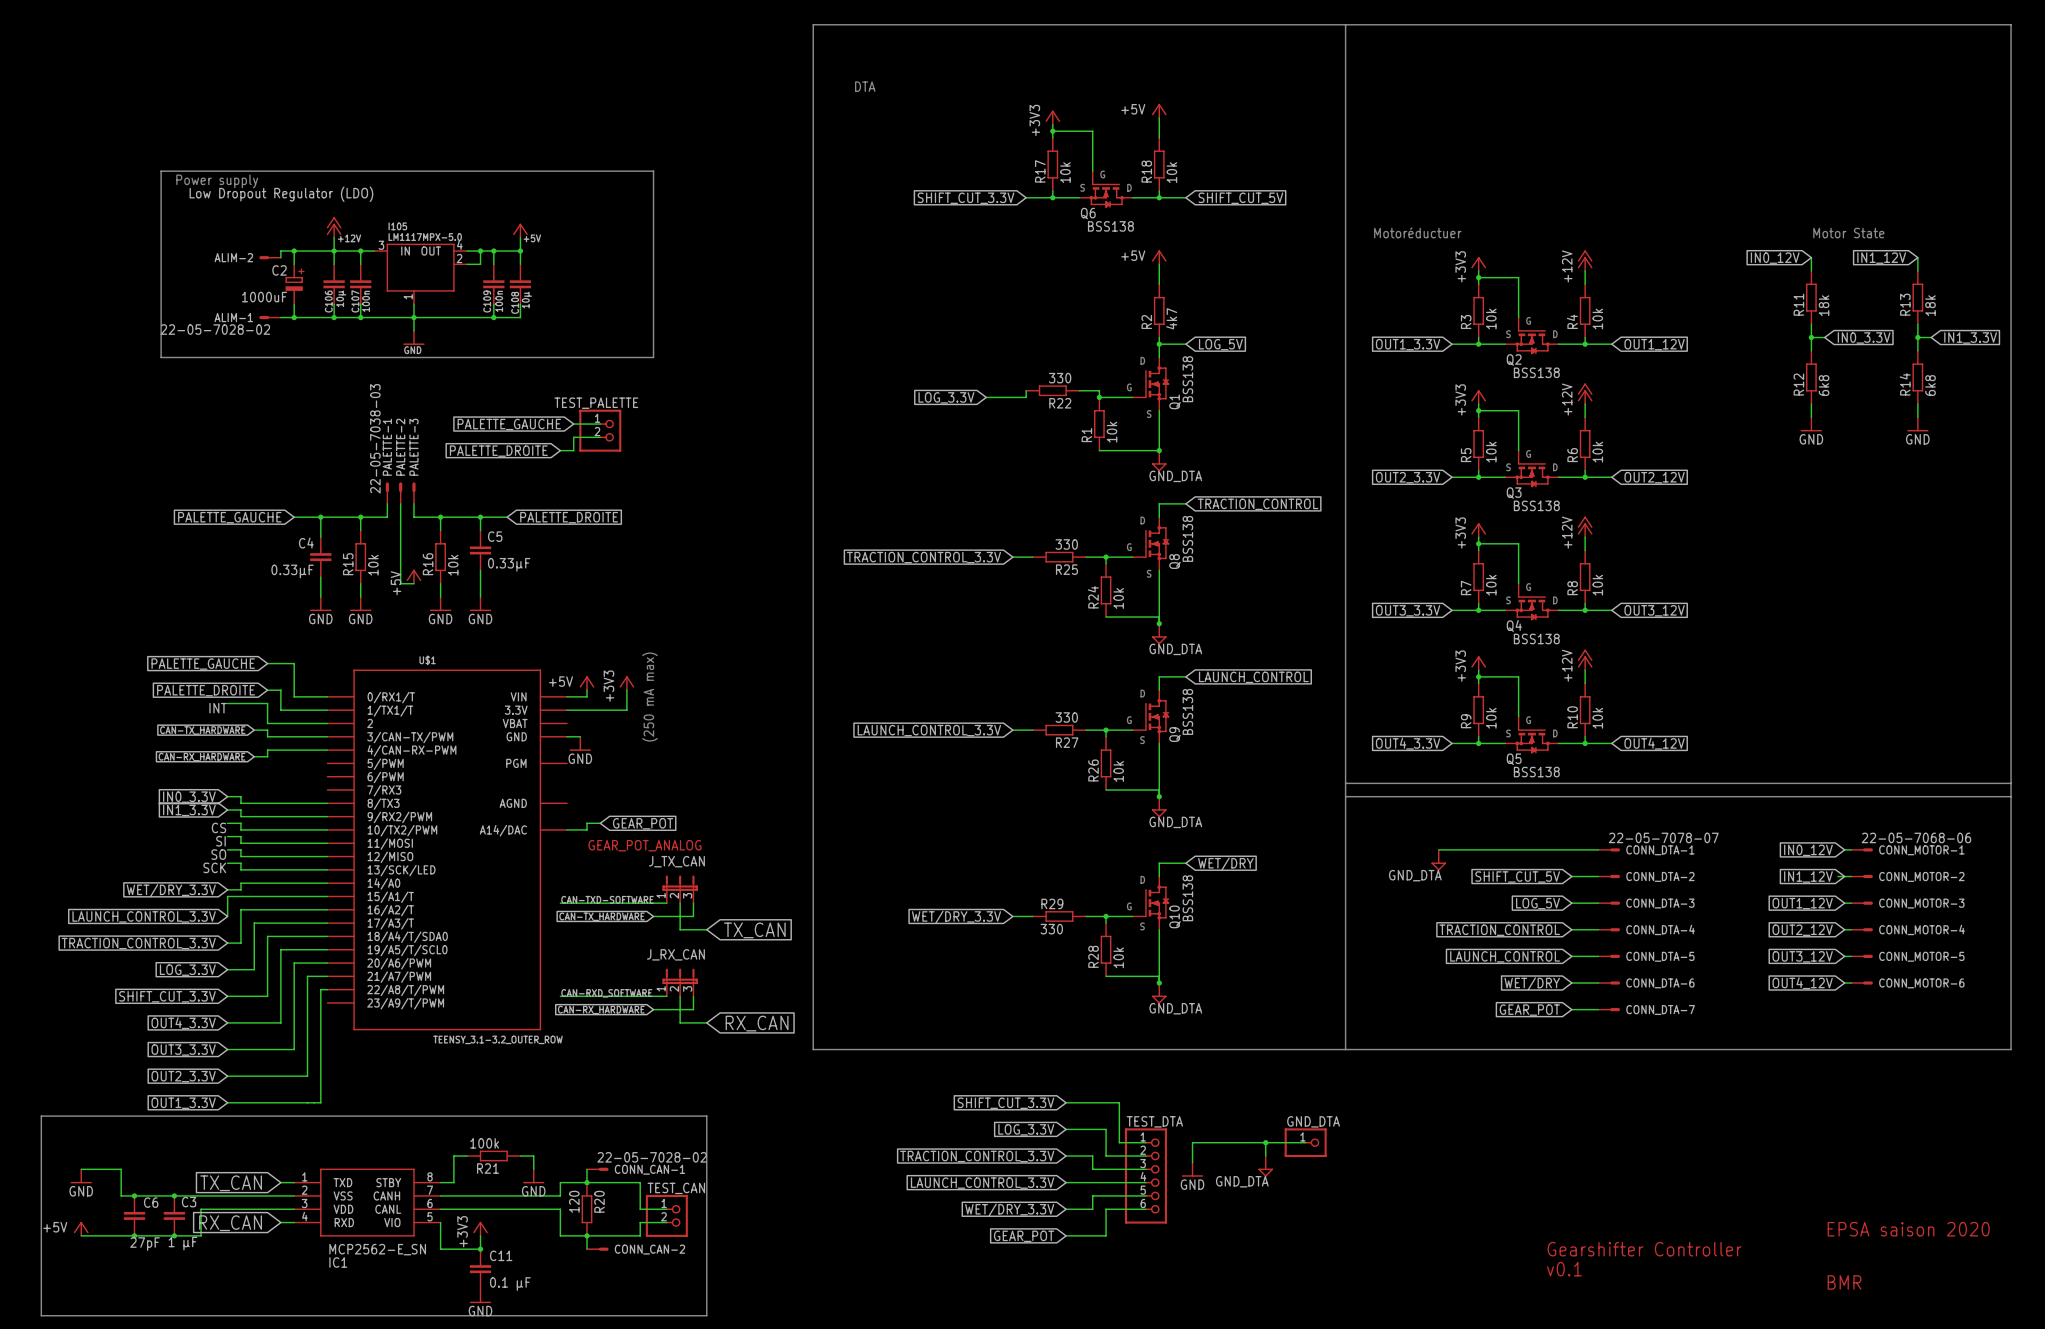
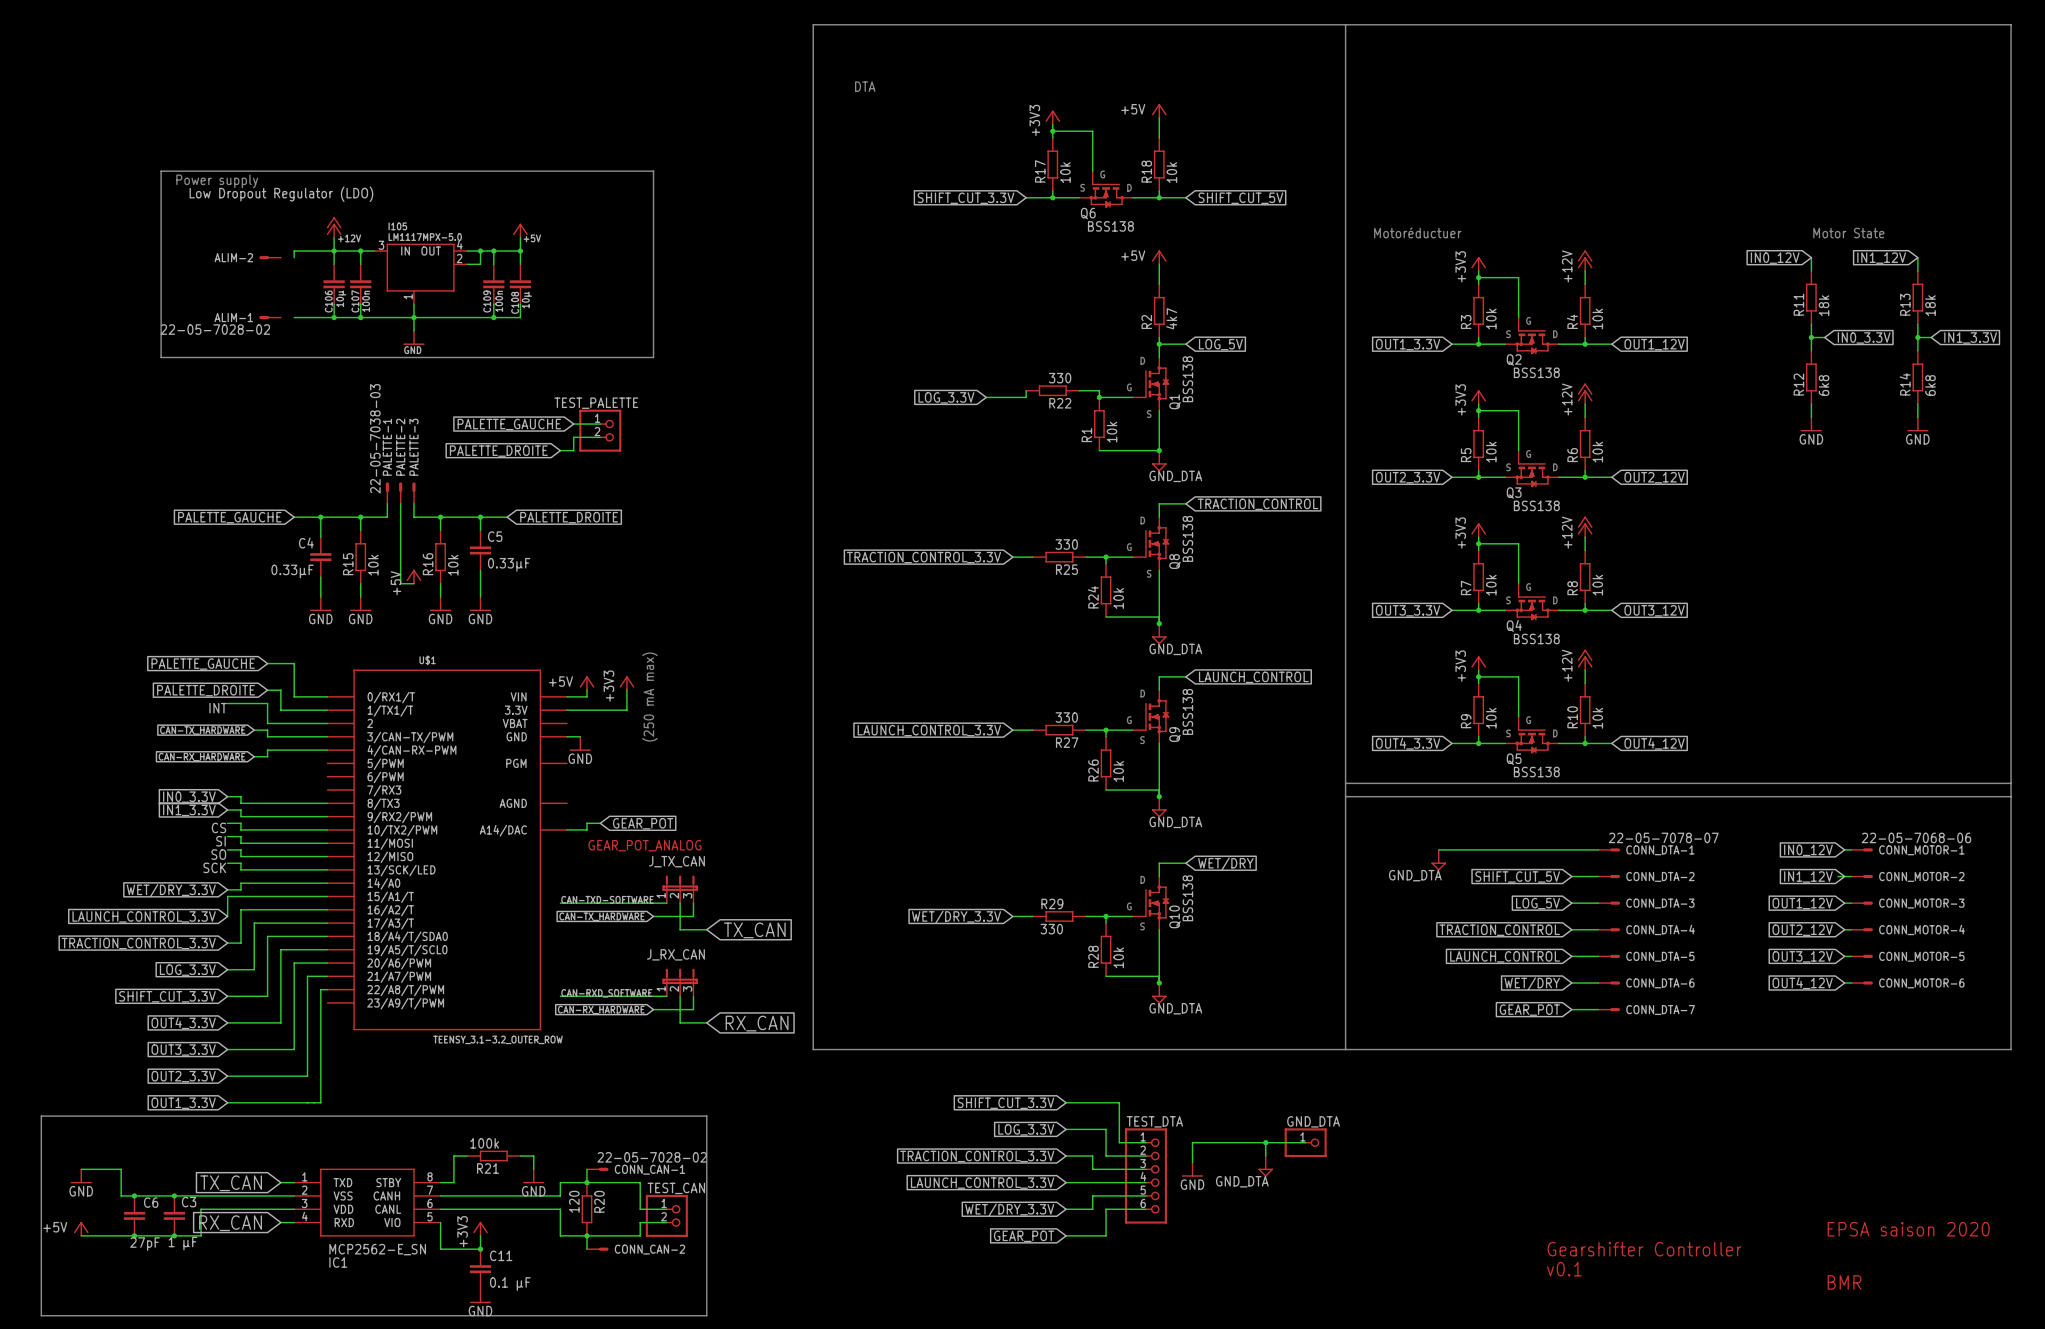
wire: (294, 251) (280, 251) (280, 257) -> none
junction: (294, 251) -> none
wire: (294, 257) (294, 264) -> none
C2: 1000uF (294, 284) -> none
wire: (294, 304) (294, 317) (280, 317) -> none
junction: (294, 317) -> none

